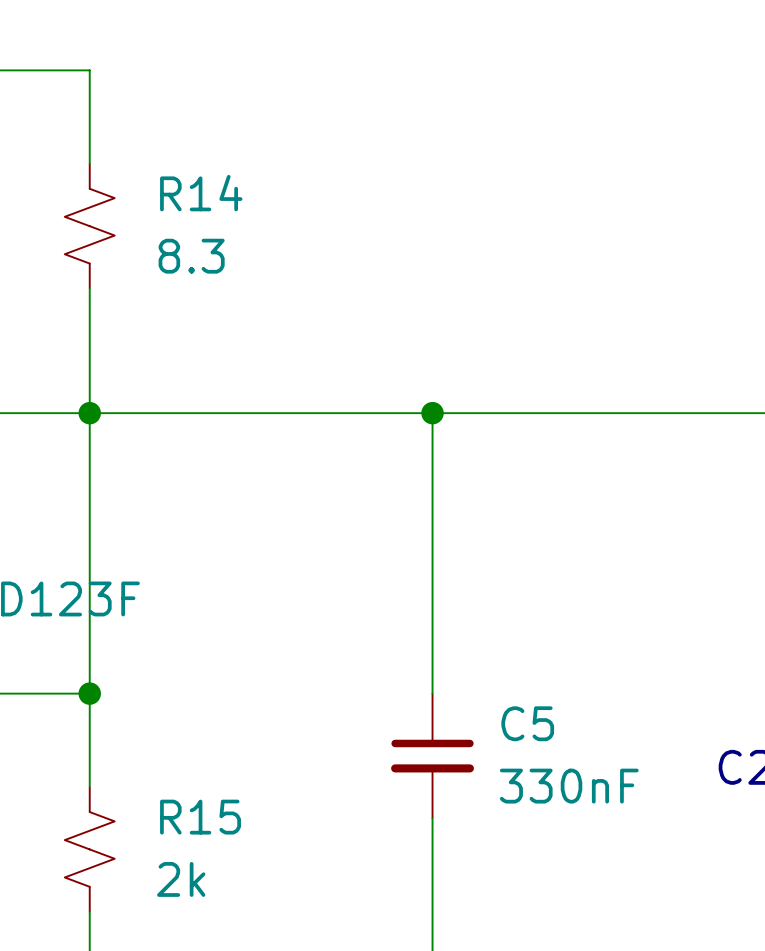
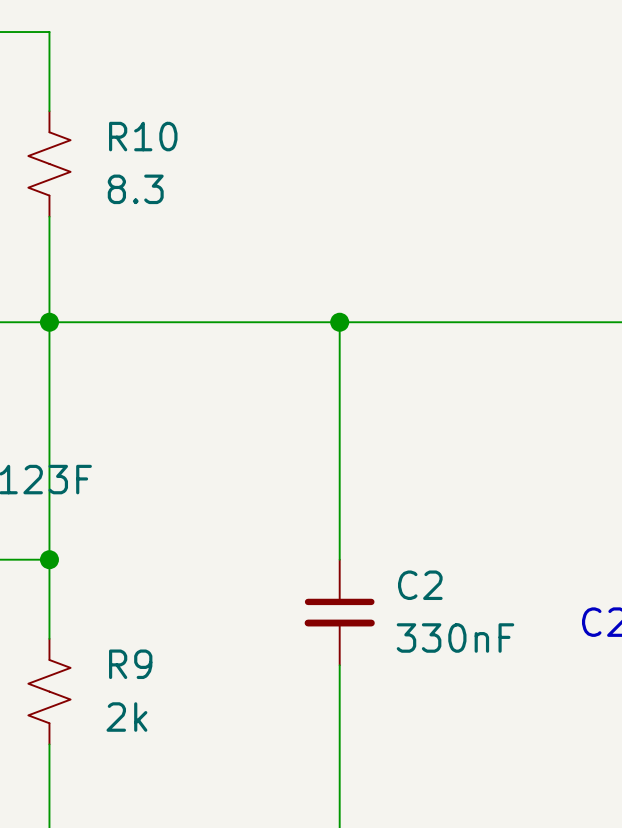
R14 name: R14 (201, 193) -> R10 (143, 136)
C5 name: C5 (527, 723) -> C2 (420, 585)
R15 name: R15 (200, 817) -> R9 (130, 664)

